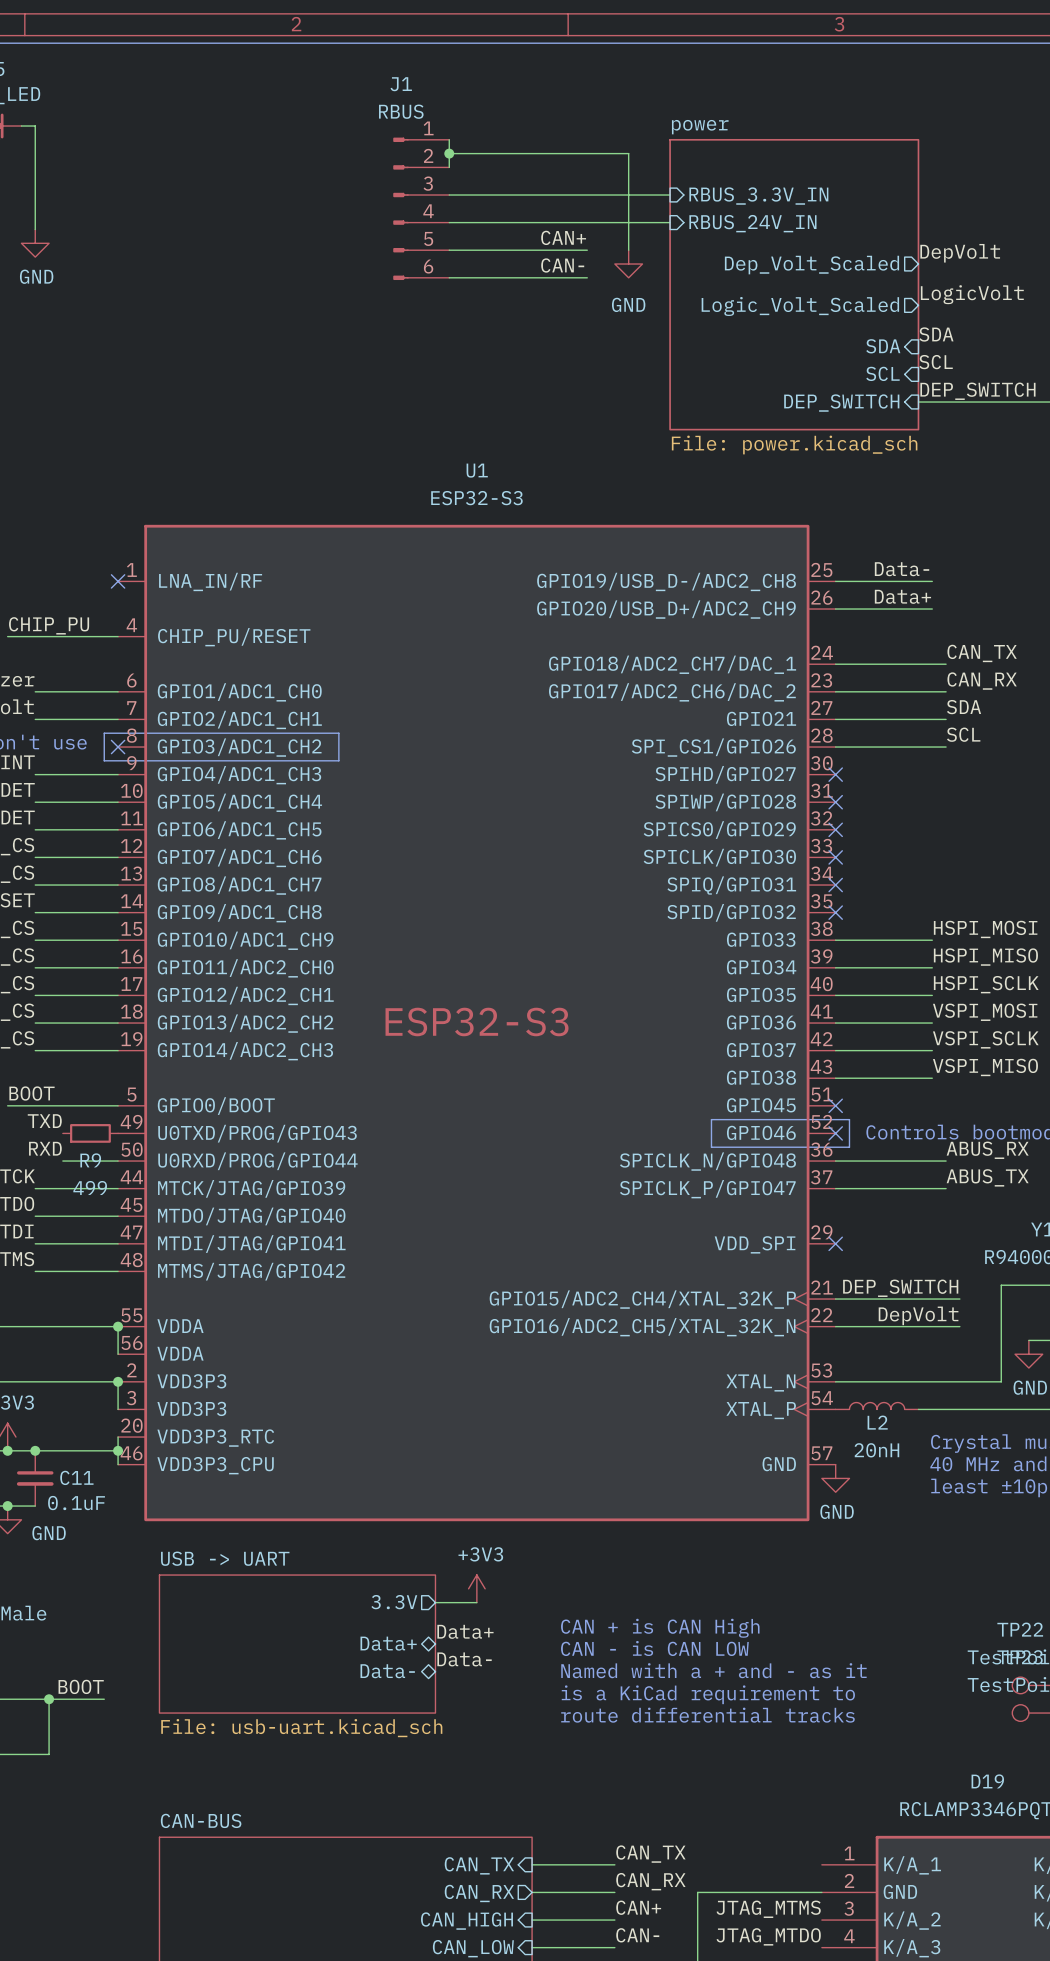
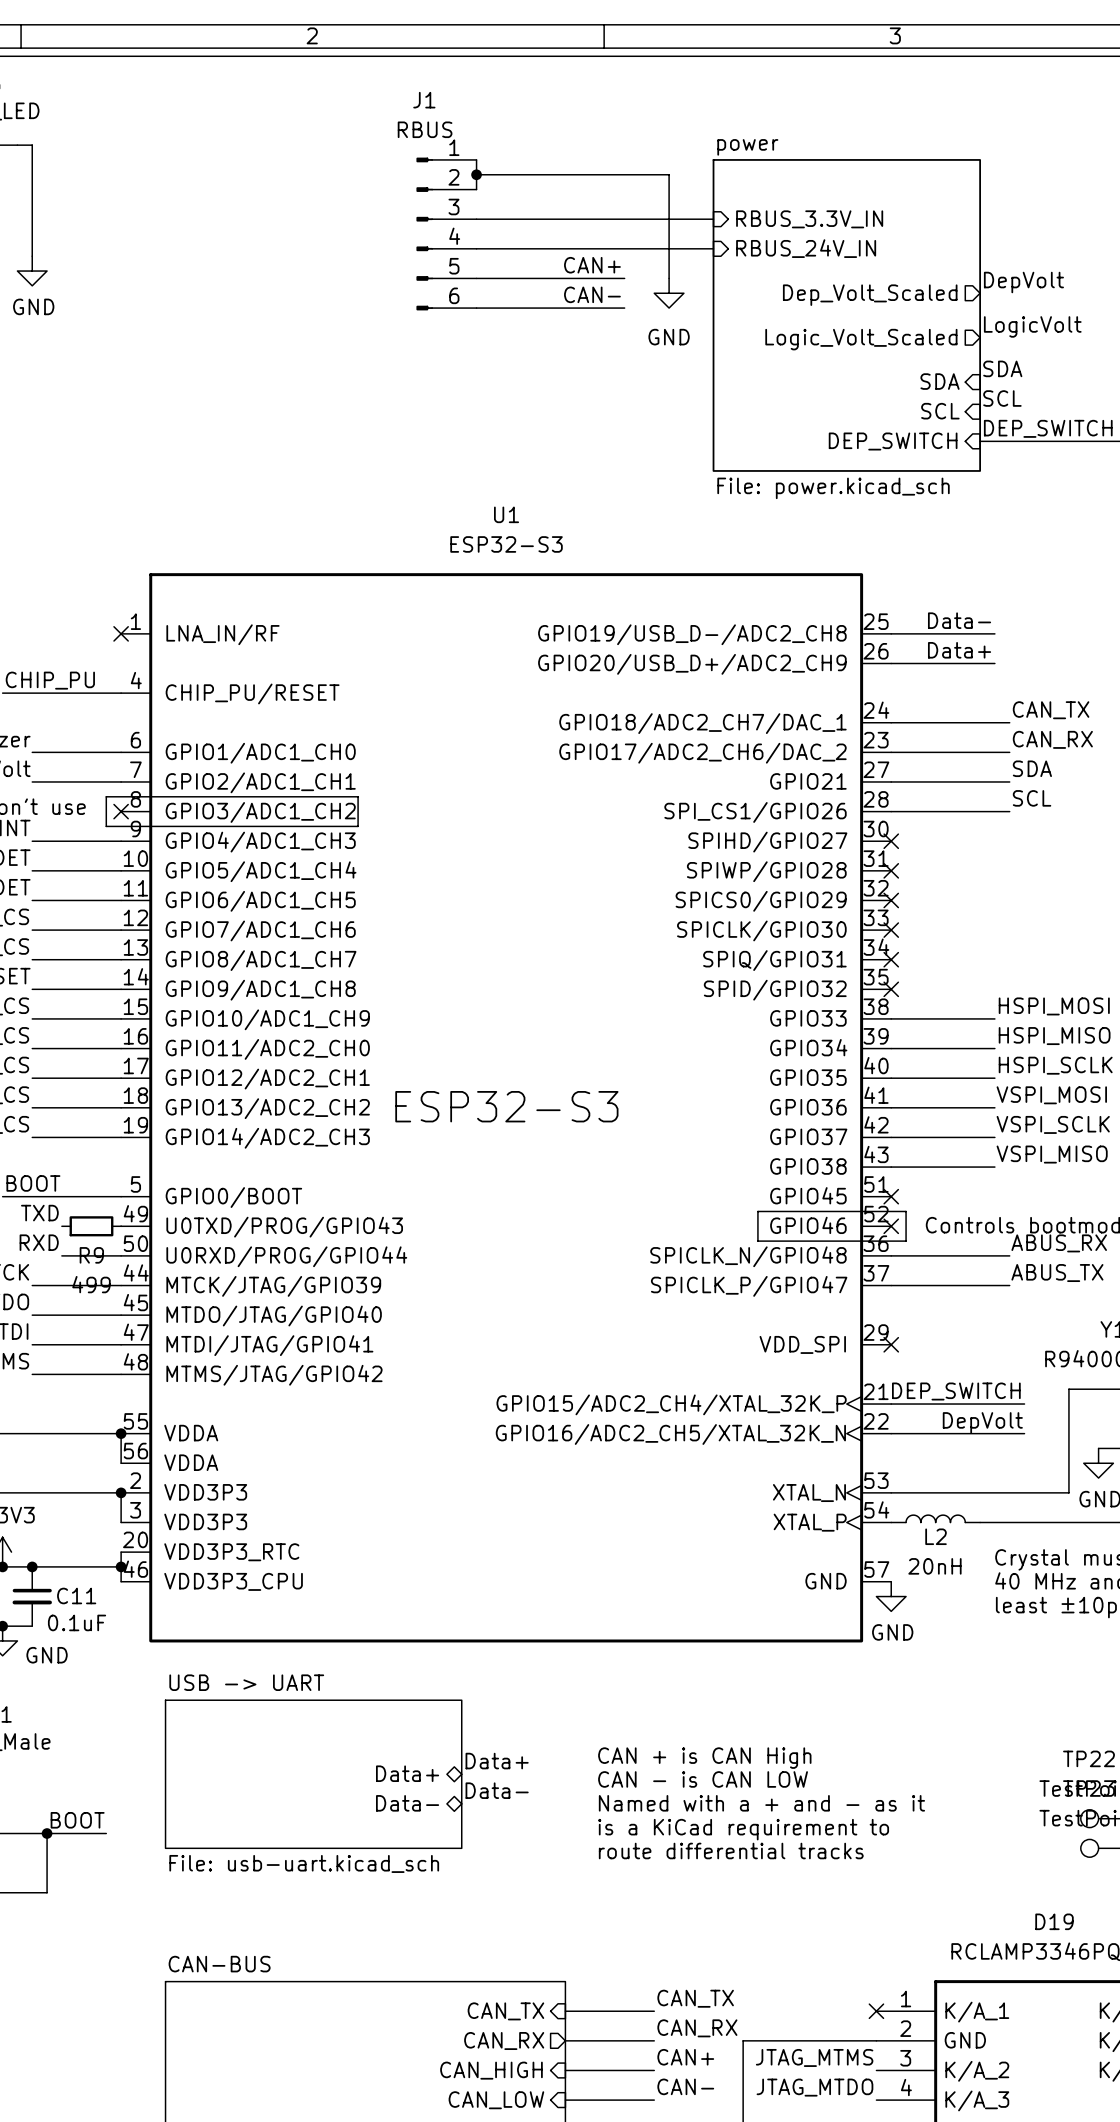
power symbol: +3V3 (476, 1588) -> none
sheet pin: 3.3V (394, 1602) -> none
wire: (435, 1602) (476, 1602) -> none
no-connect mark: none -> (876, 2011)

